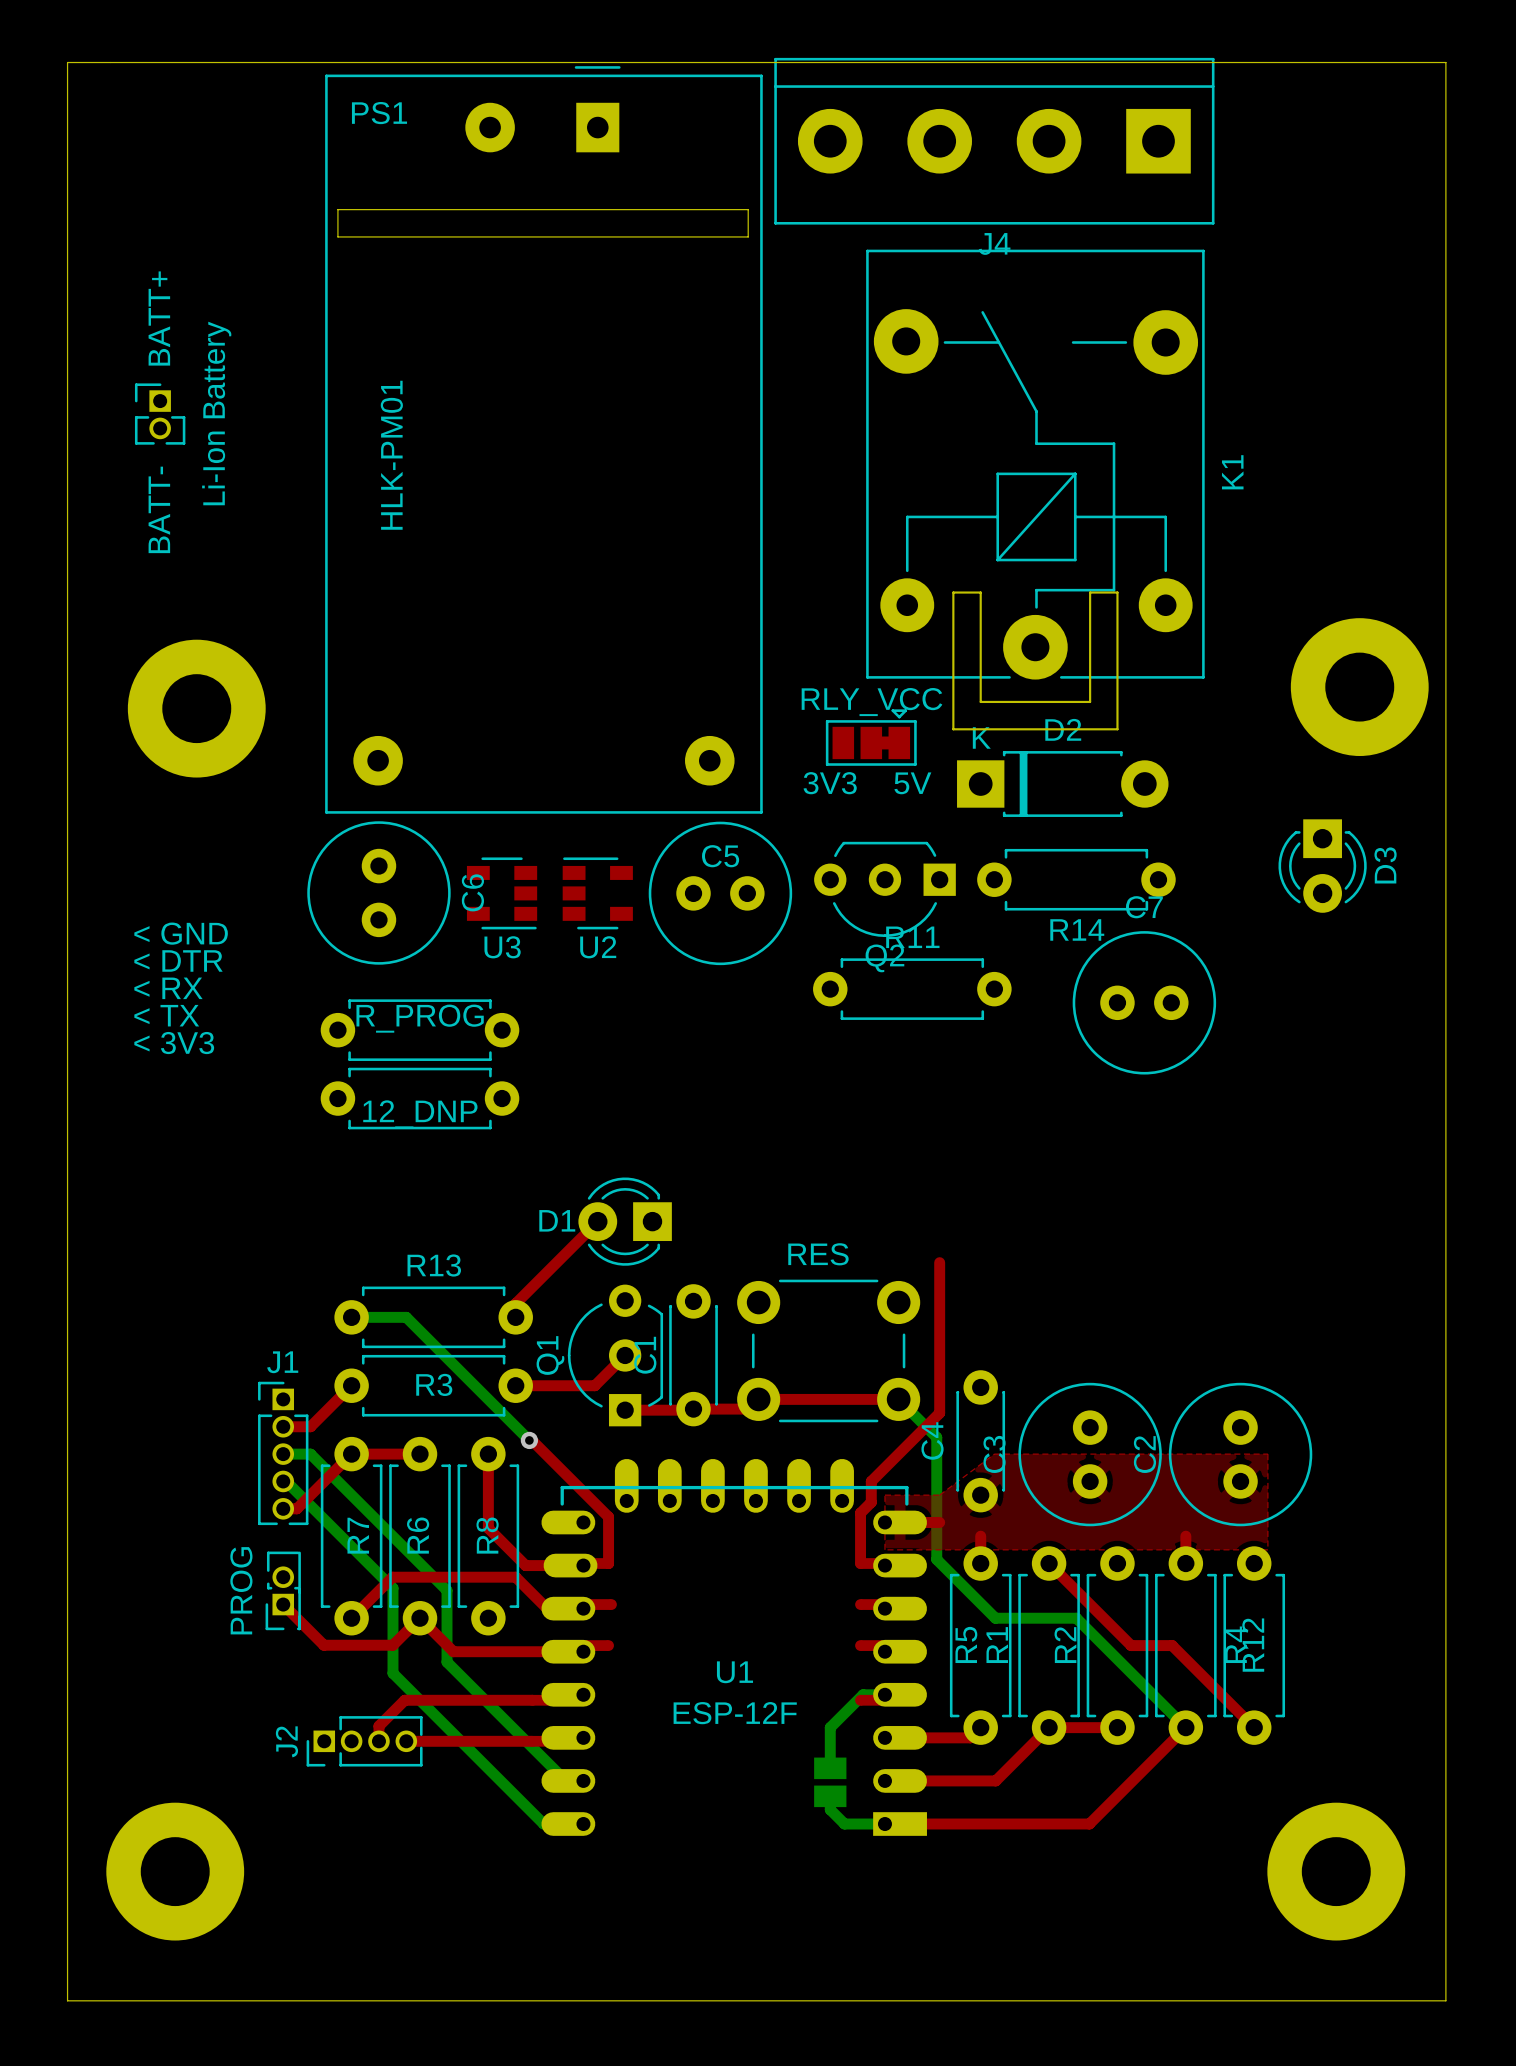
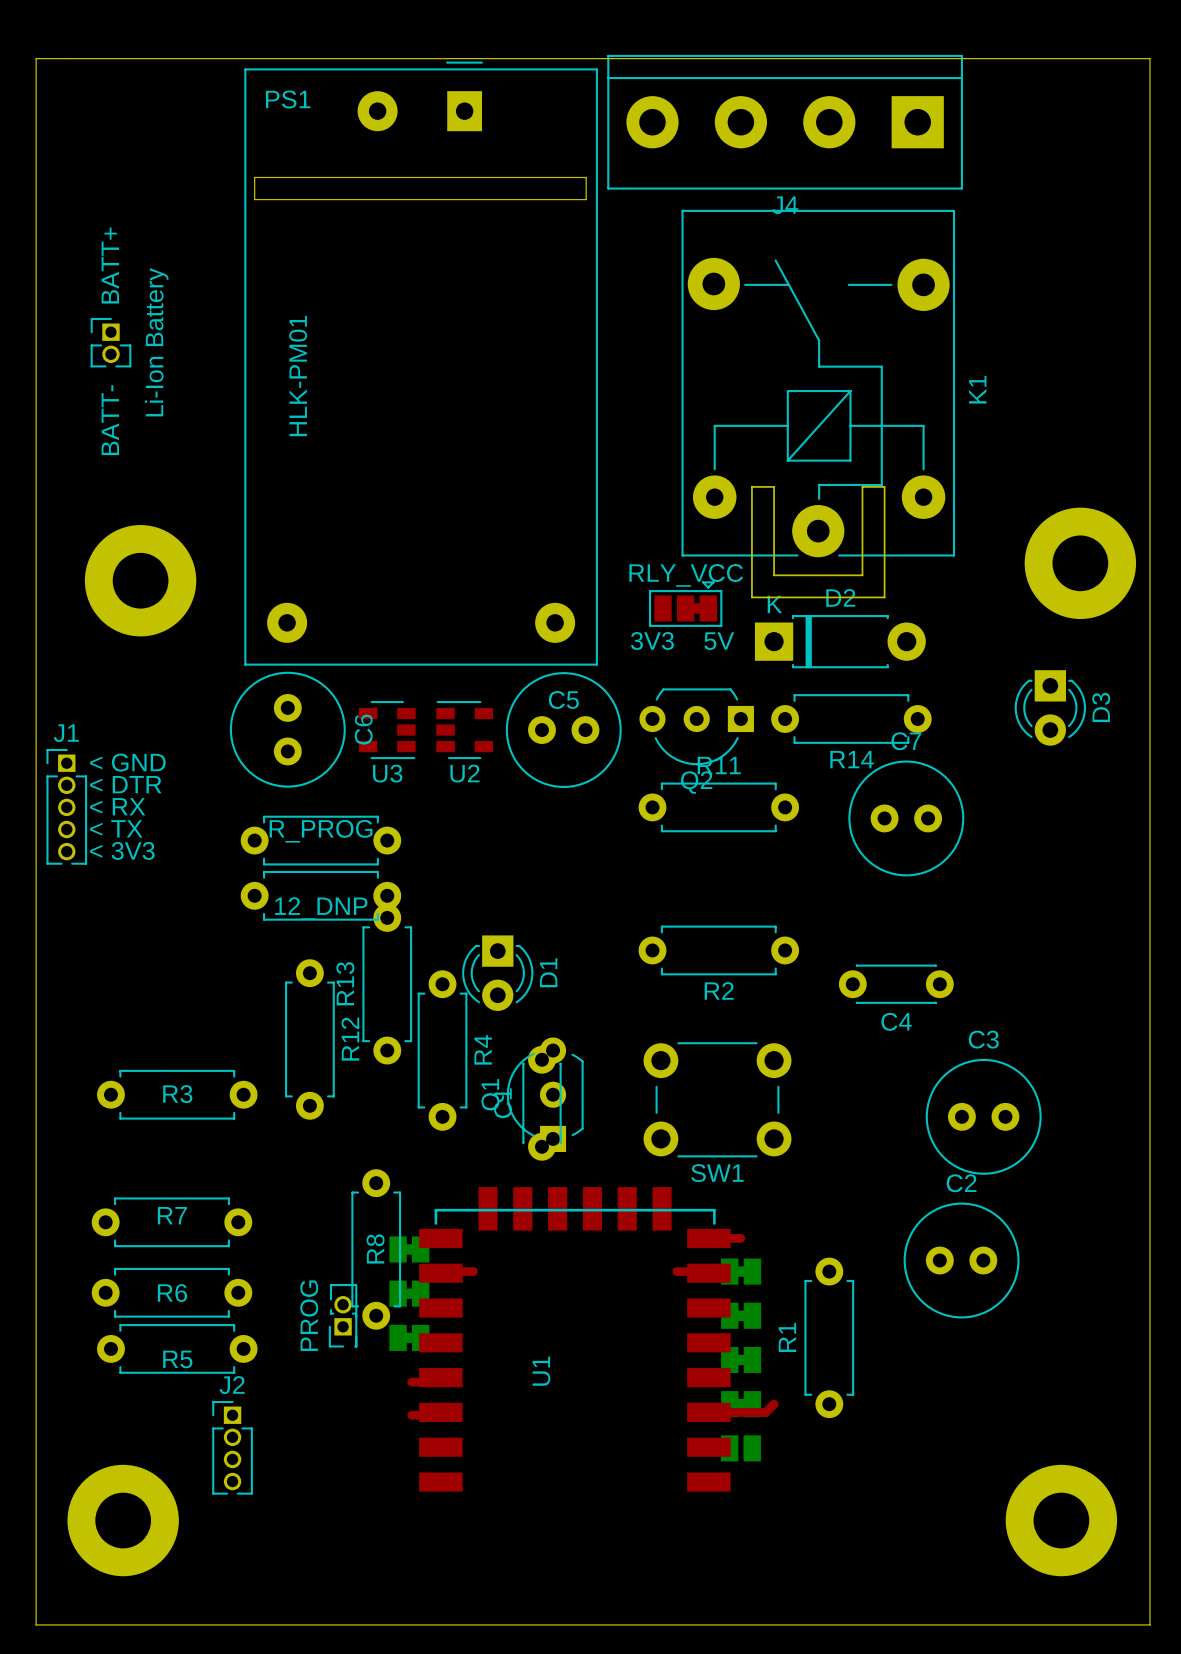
D1 footprint: [578, 1177, 672, 1266] -> [462, 935, 534, 1011]
D1 name position: D1 (557, 1220) -> D1 (548, 972)
top track: (597, 1221) (515, 1303) (515, 1317) -> none
top track: (939, 1262) (939, 1413) (871, 1481) (871, 1502) (860, 1513) (860, 1563) -> none
R13 name position: R13 (434, 1265) -> R13 (345, 983)
bottom track: (351, 1317) (406, 1317) (529, 1440) -> none
R13 rotation: 0° (433, 1317) -> 90° clockwise (387, 984)
R13 position: (433, 1317) -> (387, 984)
part: RES (828, 1350) -> none
SW1: none -> (717, 1099)
Q1 position: (615, 1355) -> (545, 1094)
top track: (625, 1355) (594, 1385) (515, 1385) -> none
top track: (351, 1385) (310, 1426) (283, 1426) -> none
R3 position: (433, 1385) -> (177, 1094)
bottom track: (898, 1399) (936, 1437) (936, 1559) (995, 1618) (1076, 1618) (1185, 1727) -> none
top track: (898, 1399) (758, 1399) (748, 1409) (625, 1410) -> none
top track: (529, 1440) (531, 1440) (608, 1517) (608, 1563) (607, 1562) -> none
via: (529, 1440) -> none
C4 name position: C4 (932, 1440) -> C4 (896, 1021)
C4 rotation: 0° (980, 1441) -> 90° clockwise (896, 984)
C4 position: (980, 1441) -> (896, 984)
J1 position: (283, 1453) -> (66, 806)
bottom track: (283, 1454) (310, 1454) (447, 1590) (447, 1662) (565, 1780) (583, 1780) -> none
top track: (420, 1454) (351, 1454) (296, 1508) (283, 1508) -> none
top track: (488, 1454) (488, 1528) (525, 1565) (583, 1565) -> none
top zone outline: (994, 1454) (939, 1495) (884, 1495) (884, 1549) (1267, 1549) (1267, 1454) (994, 1454) -> none
C3 rotation: 0° (1090, 1454) -> 90° clockwise (983, 1116)
C3 position: (1090, 1454) -> (983, 1116)
C2 rotation: 0° (1240, 1454) -> 90° clockwise (961, 1260)
C2 position: (1240, 1454) -> (961, 1260)
U1 footprint: [541, 1458, 927, 1836] -> [419, 1187, 731, 1492]
bottom track: (283, 1481) (286, 1481) (392, 1588) (392, 1673) (543, 1824) (583, 1824) -> none
R7 rotation: 0° (351, 1536) -> 90° clockwise (171, 1222)
R7 position: (351, 1536) -> (171, 1222)
R6 rotation: 0° (420, 1536) -> 90° clockwise (171, 1292)
R6 position: (420, 1536) -> (171, 1292)
part: none -> (409, 1249)
top track: (980, 1536) (980, 1563) -> none
top track: (1185, 1536) (1185, 1563) -> none
part: none -> (741, 1271)
top track: (1049, 1563) (1131, 1645) (1172, 1645) (1254, 1727) -> none
part position: (283, 1590) -> (343, 1315)
part: none -> (409, 1293)
top track: (283, 1604) (323, 1645) (392, 1645) (420, 1618) (453, 1651) (583, 1651) -> none
part: (600, 1604) -> none
part: (871, 1604) -> none
top track: (583, 1608) (547, 1608) (515, 1577) (392, 1577) (351, 1618) -> none
part: none -> (741, 1315)
part: none -> (409, 1337)
part: (597, 1645) -> none
part: (871, 1645) -> none
R5 rotation: 0° (980, 1645) -> 90° clockwise (177, 1348)
R5 position: (980, 1645) -> (177, 1348)
R2 name position: R2 (1065, 1645) -> R2 (719, 990)
R2 rotation: 0° (1117, 1645) -> 90° clockwise (718, 950)
R2 position: (1117, 1645) -> (718, 950)
R4 position: (1185, 1645) -> (442, 1050)
R12 name position: R12 (1253, 1645) -> R12 (350, 1039)
R12 position: (1254, 1645) -> (309, 1039)
part: none -> (741, 1359)
bottom track: (884, 1694) (863, 1694) (830, 1727) (830, 1768) -> none
top track: (532, 1700) (404, 1700) (378, 1726) (378, 1741) -> none
part: (871, 1700) -> none
U1 value: ESP-12F (735, 1713) -> none
part: none -> (741, 1404)
top track: (1117, 1727) (1049, 1727) (995, 1780) (884, 1780) -> none
top track: (1185, 1727) (1089, 1824) (884, 1824) -> none
J2 rotation: 0° (364, 1741) -> 90° clockwise (232, 1447)
top track: (406, 1741) (531, 1741) -> none
part rotation: 0° (830, 1782) -> 90° clockwise (740, 1448)
part position: (830, 1782) -> (740, 1448)
bottom track: (830, 1796) (830, 1809) (844, 1824) (884, 1824) -> none

